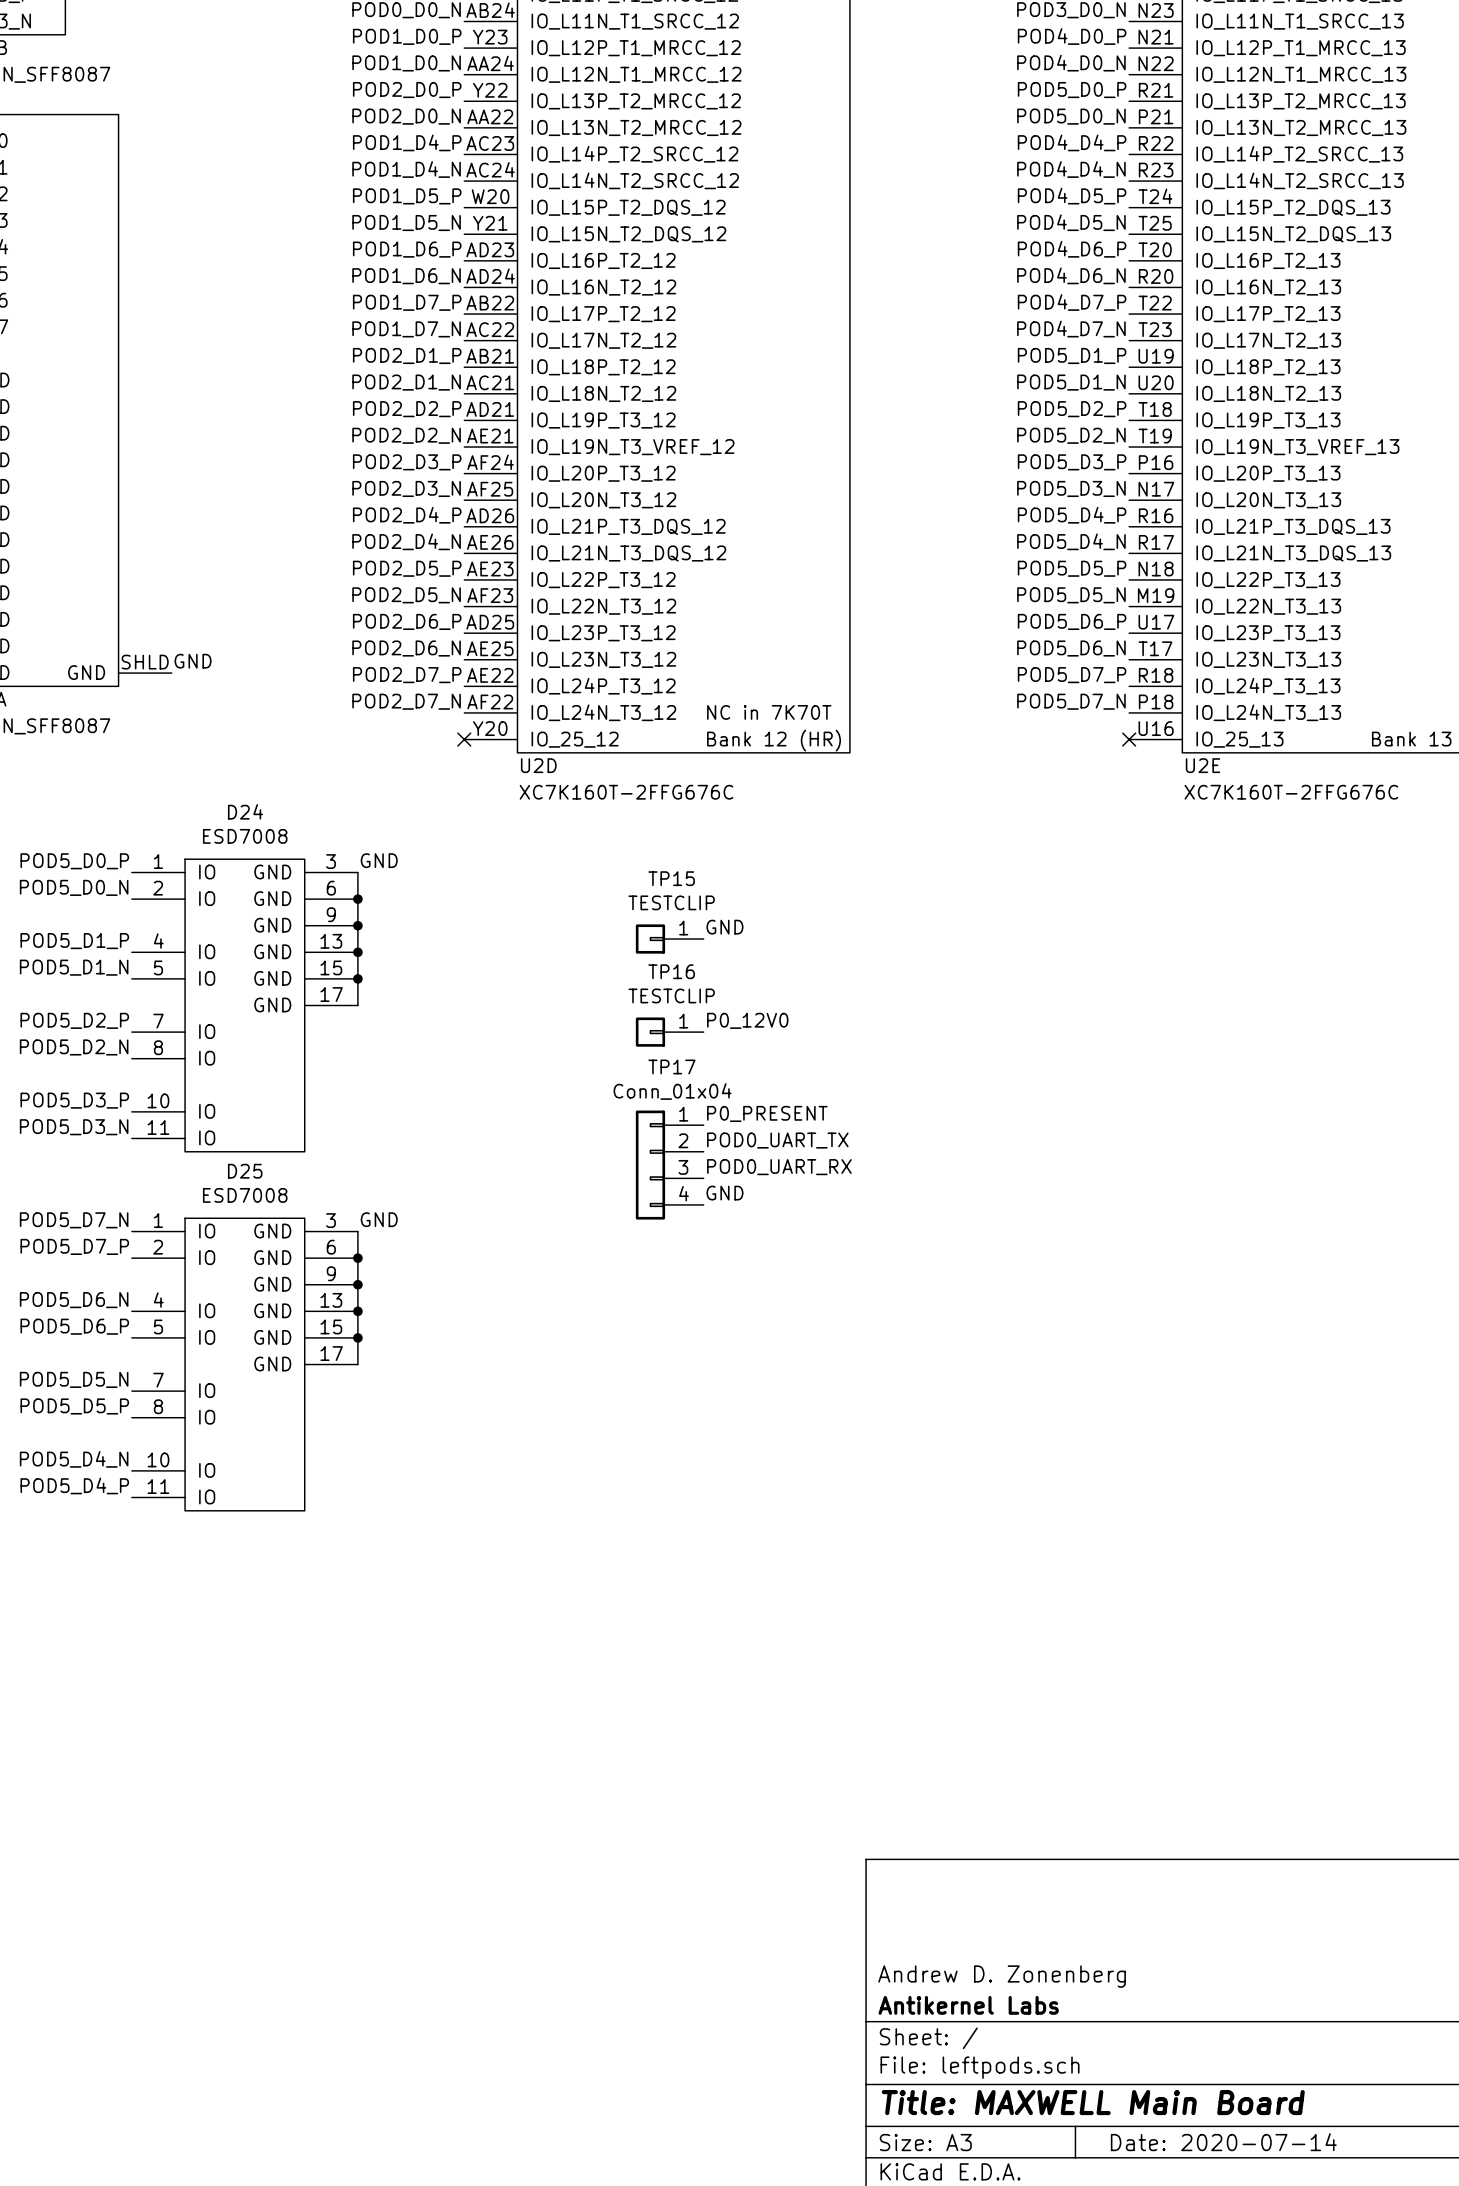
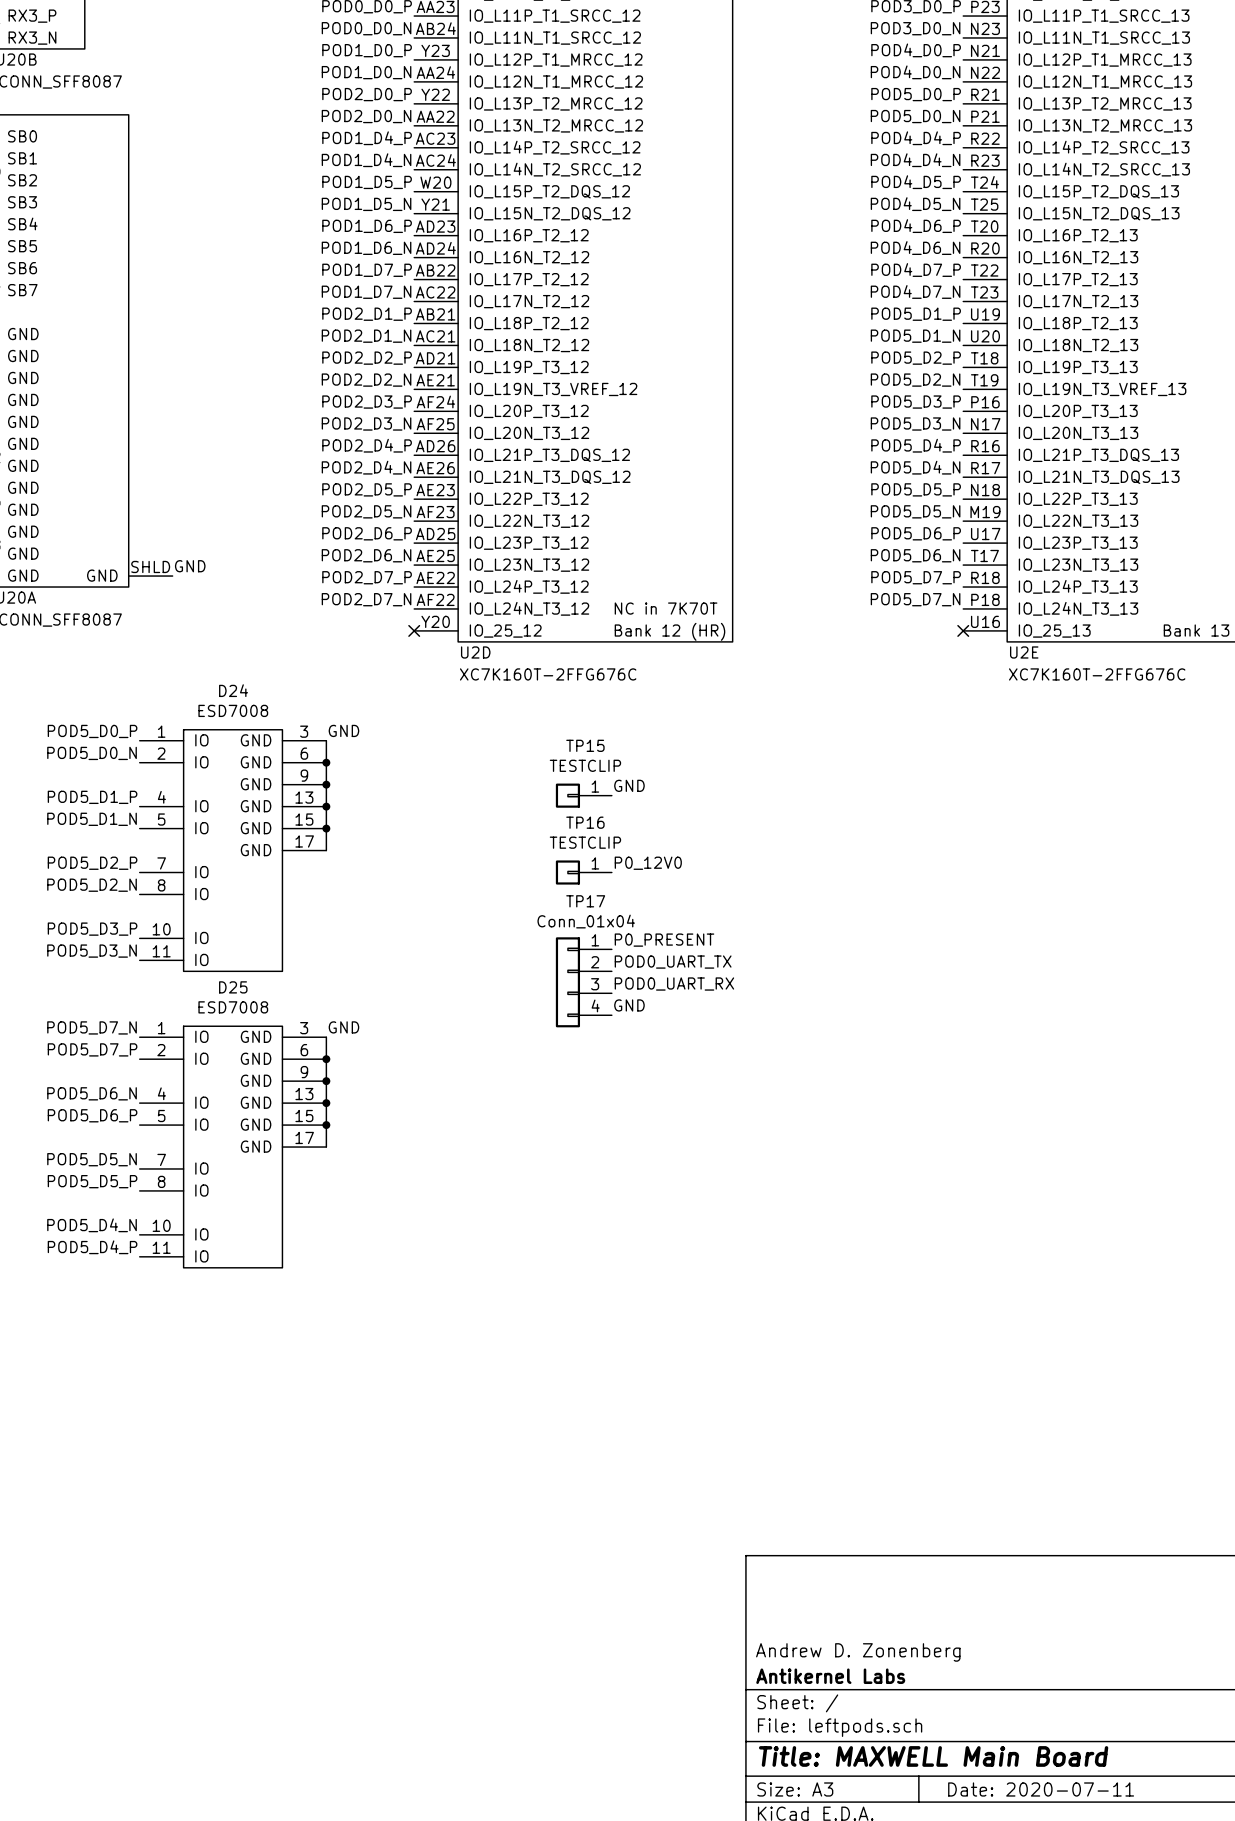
title block: Date: 2020-07-14 (1223, 2142) -> Date: 2020-07-11 (1041, 1789)

